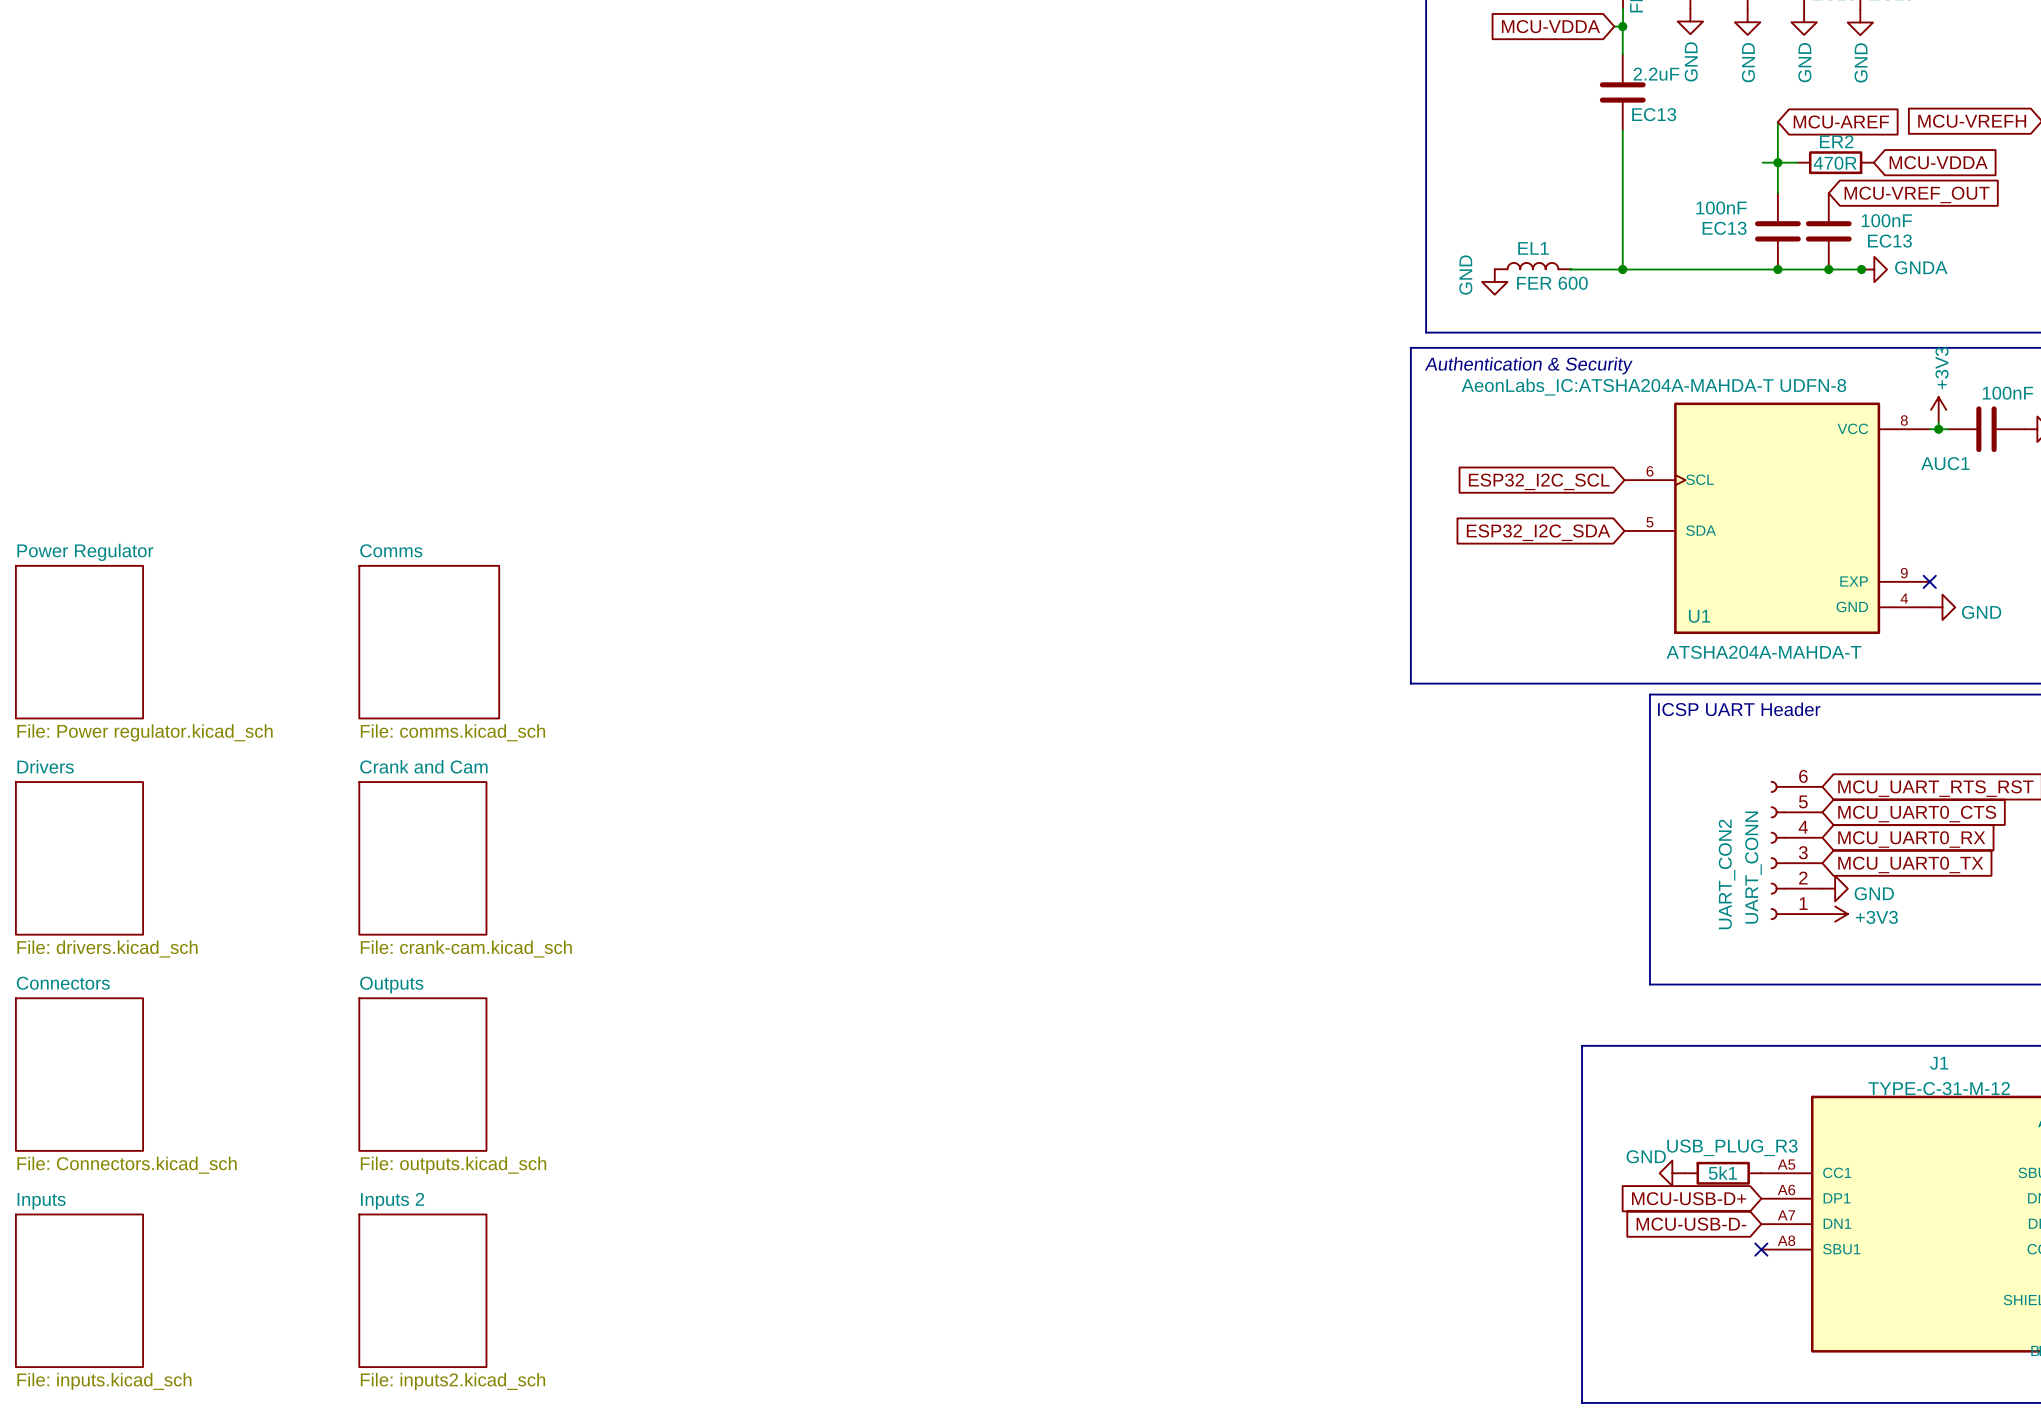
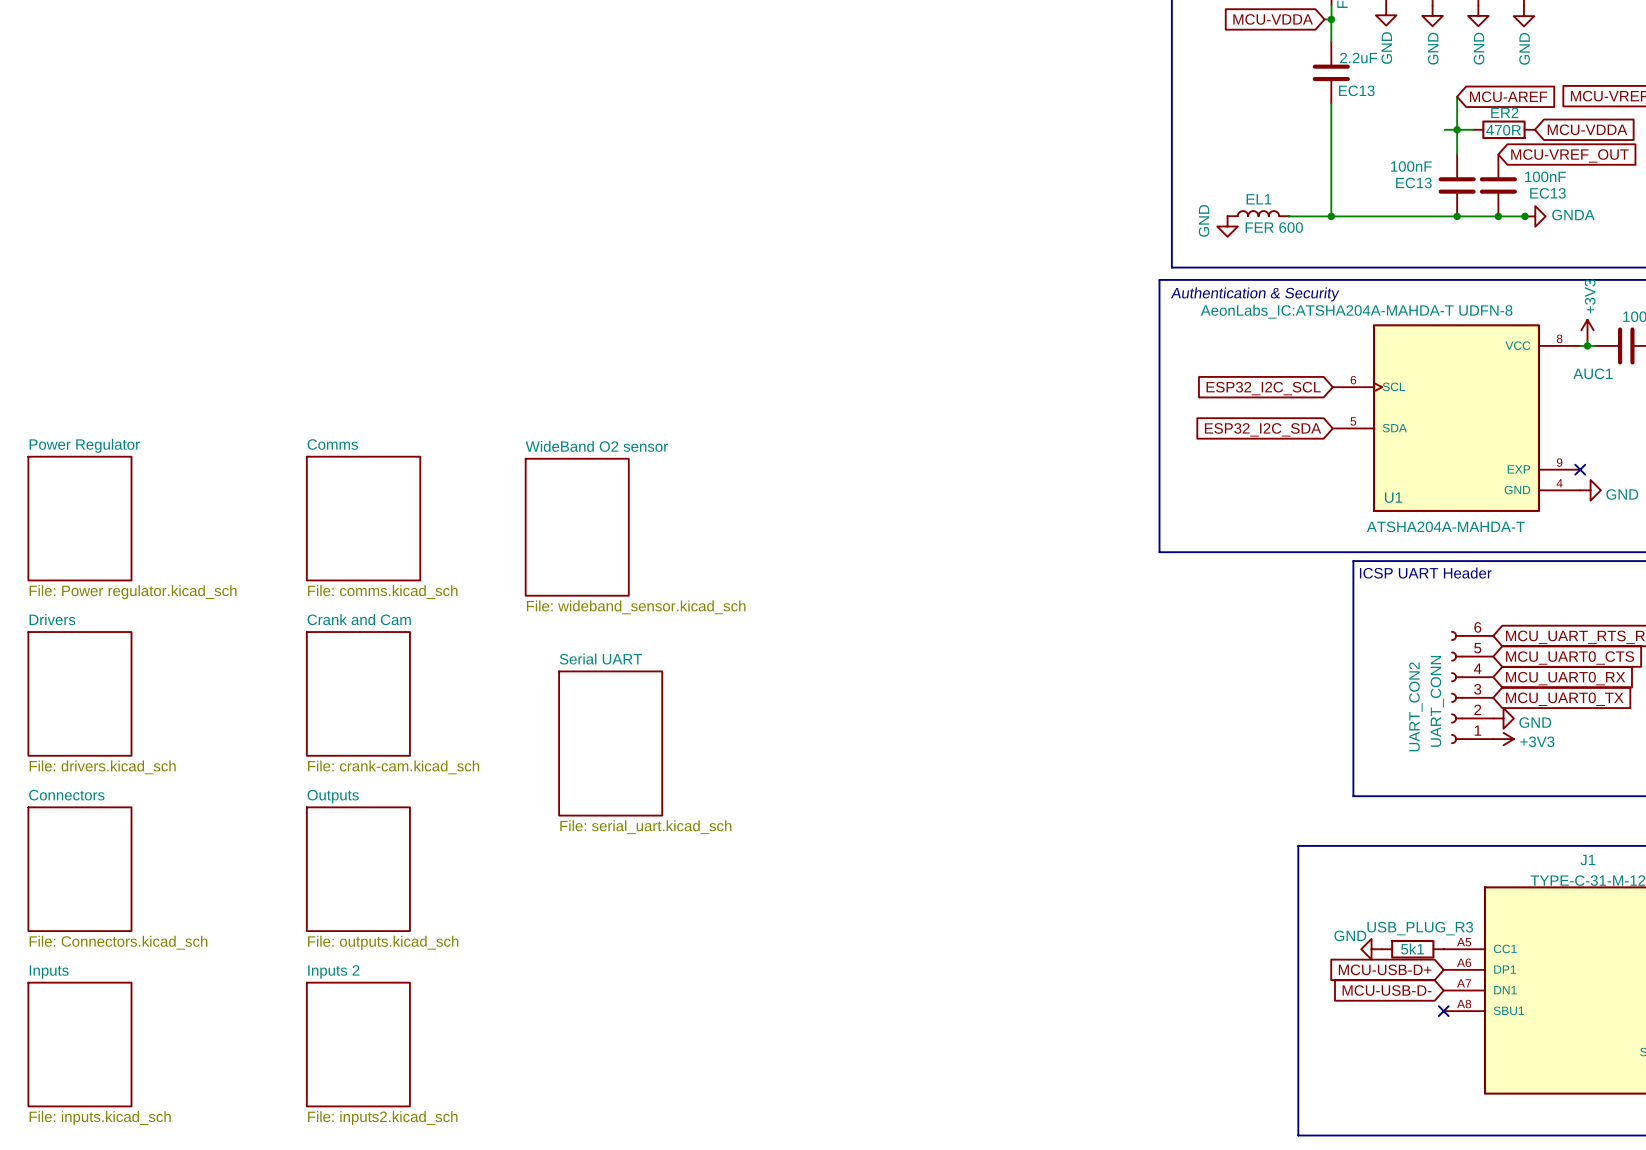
sheet WideBand O2 sensor: none -> File: wideband_sensor.kicad_sch (577, 527)
sheet Serial UART: none -> File: serial_uart.kicad_sch (610, 743)

